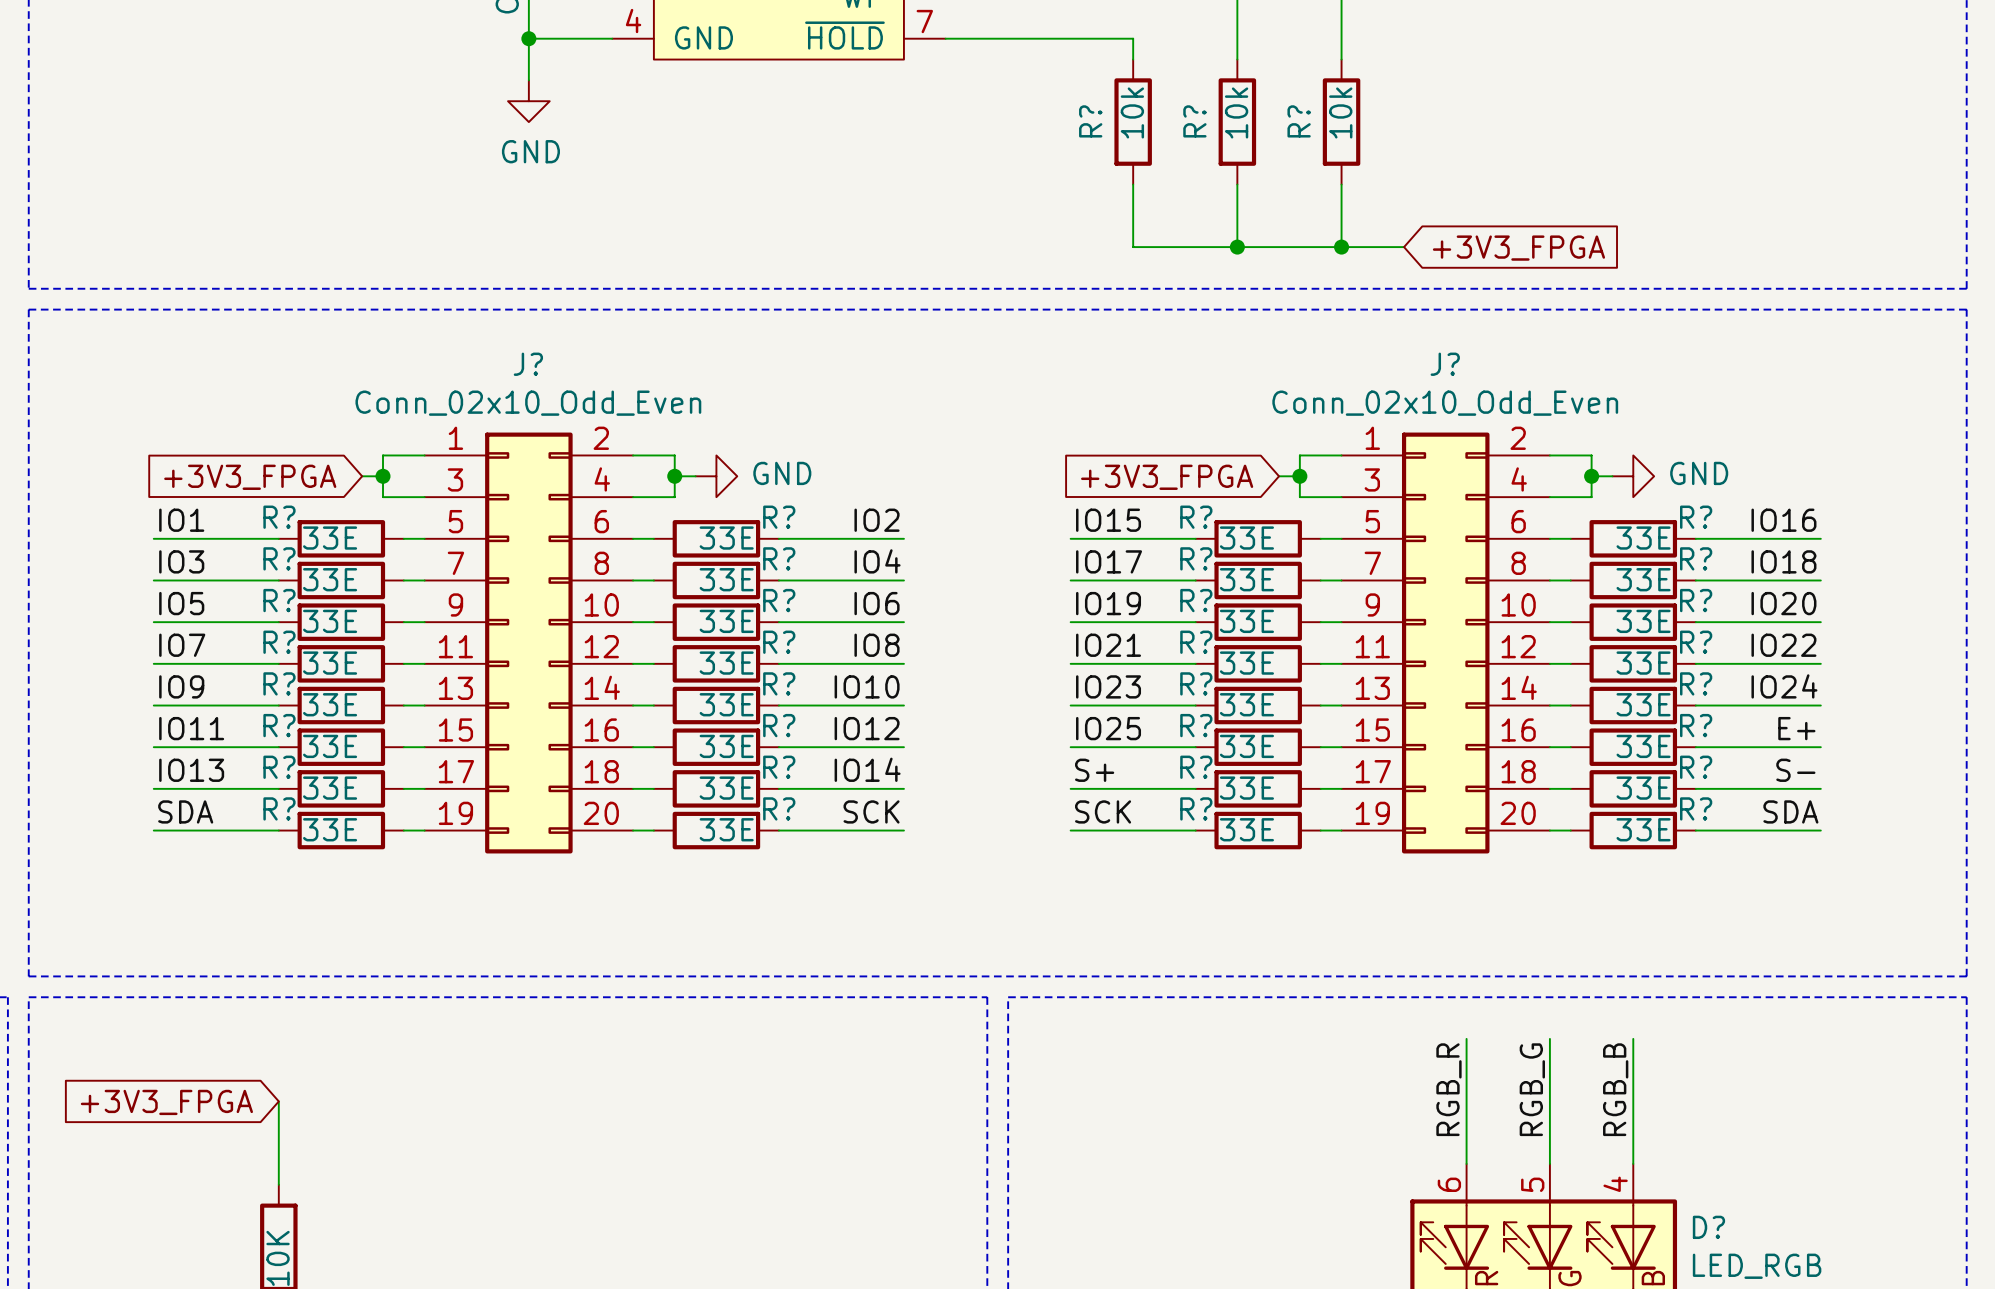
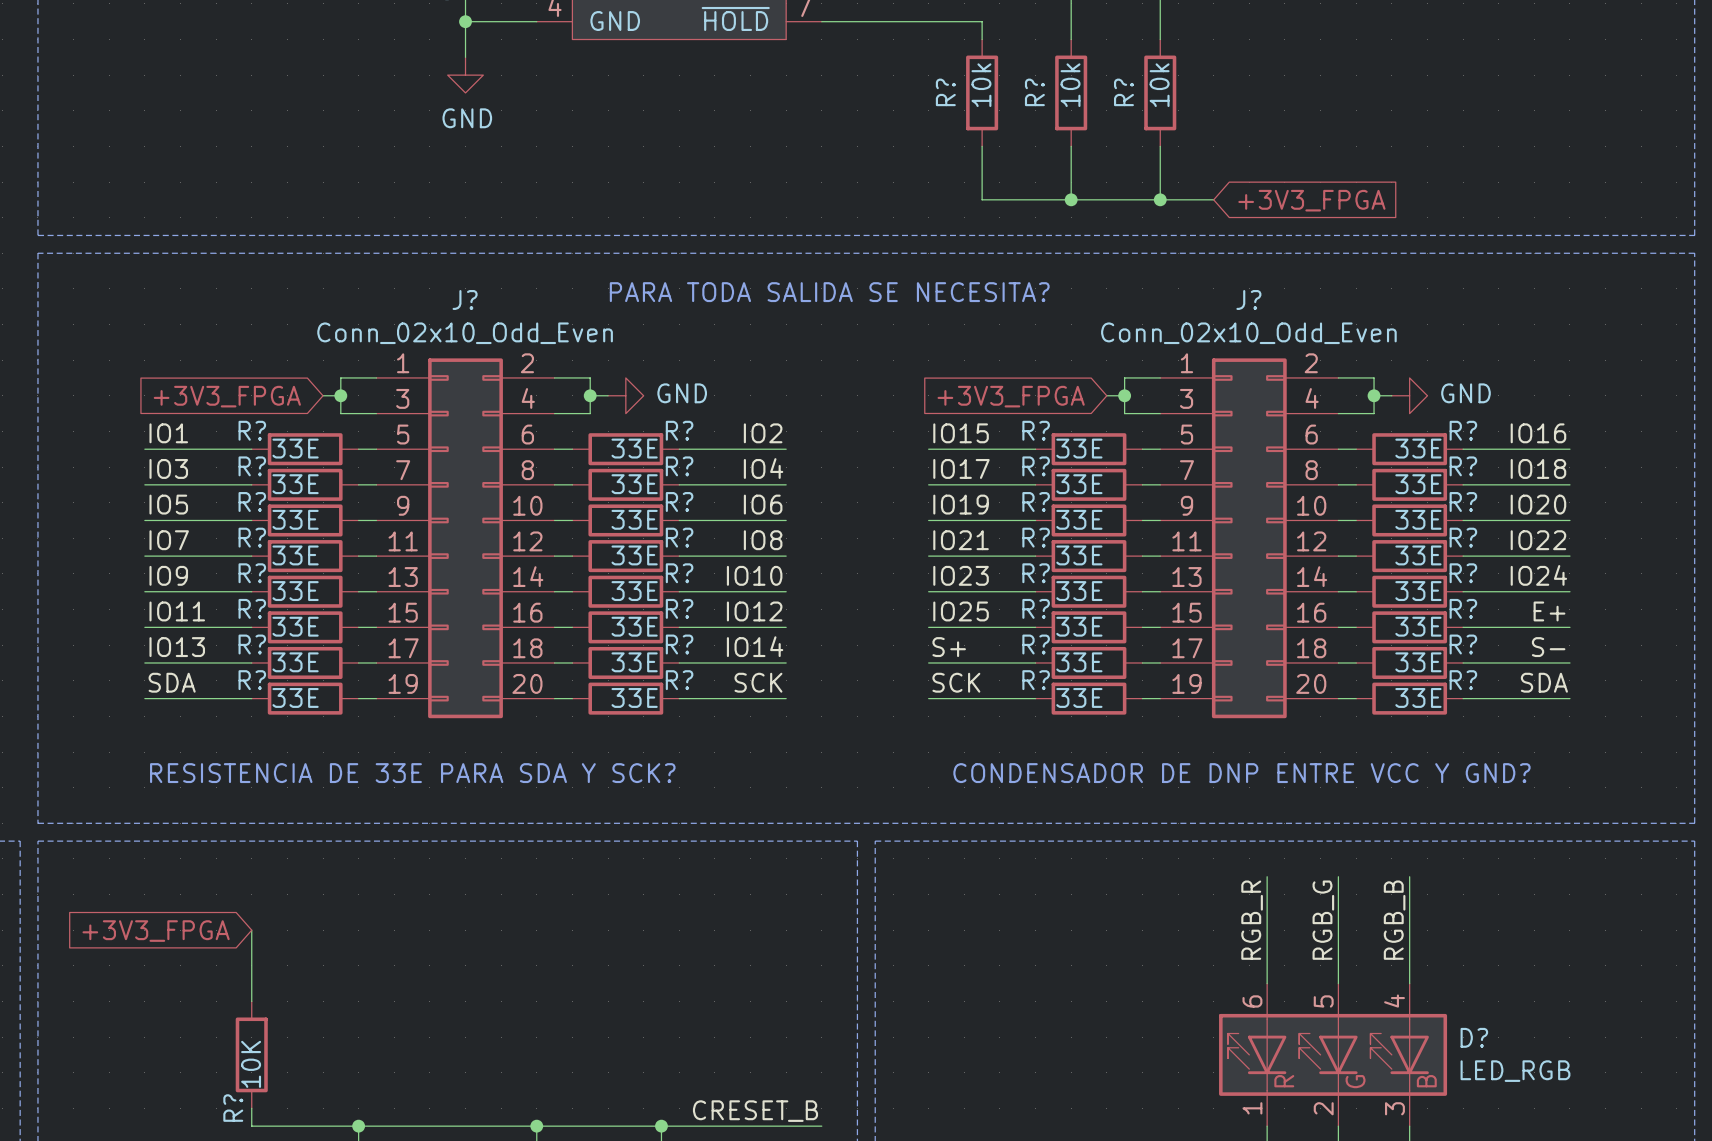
text: none -> PARA TODA SALIDA SE NECESITA? (829, 292)
text: none -> RESISTENCIA DE 33E PARA SDA Y SCK? (412, 773)
text: none -> CONDENSADOR DE DNP ENTRE VCC Y GND? (1241, 773)

